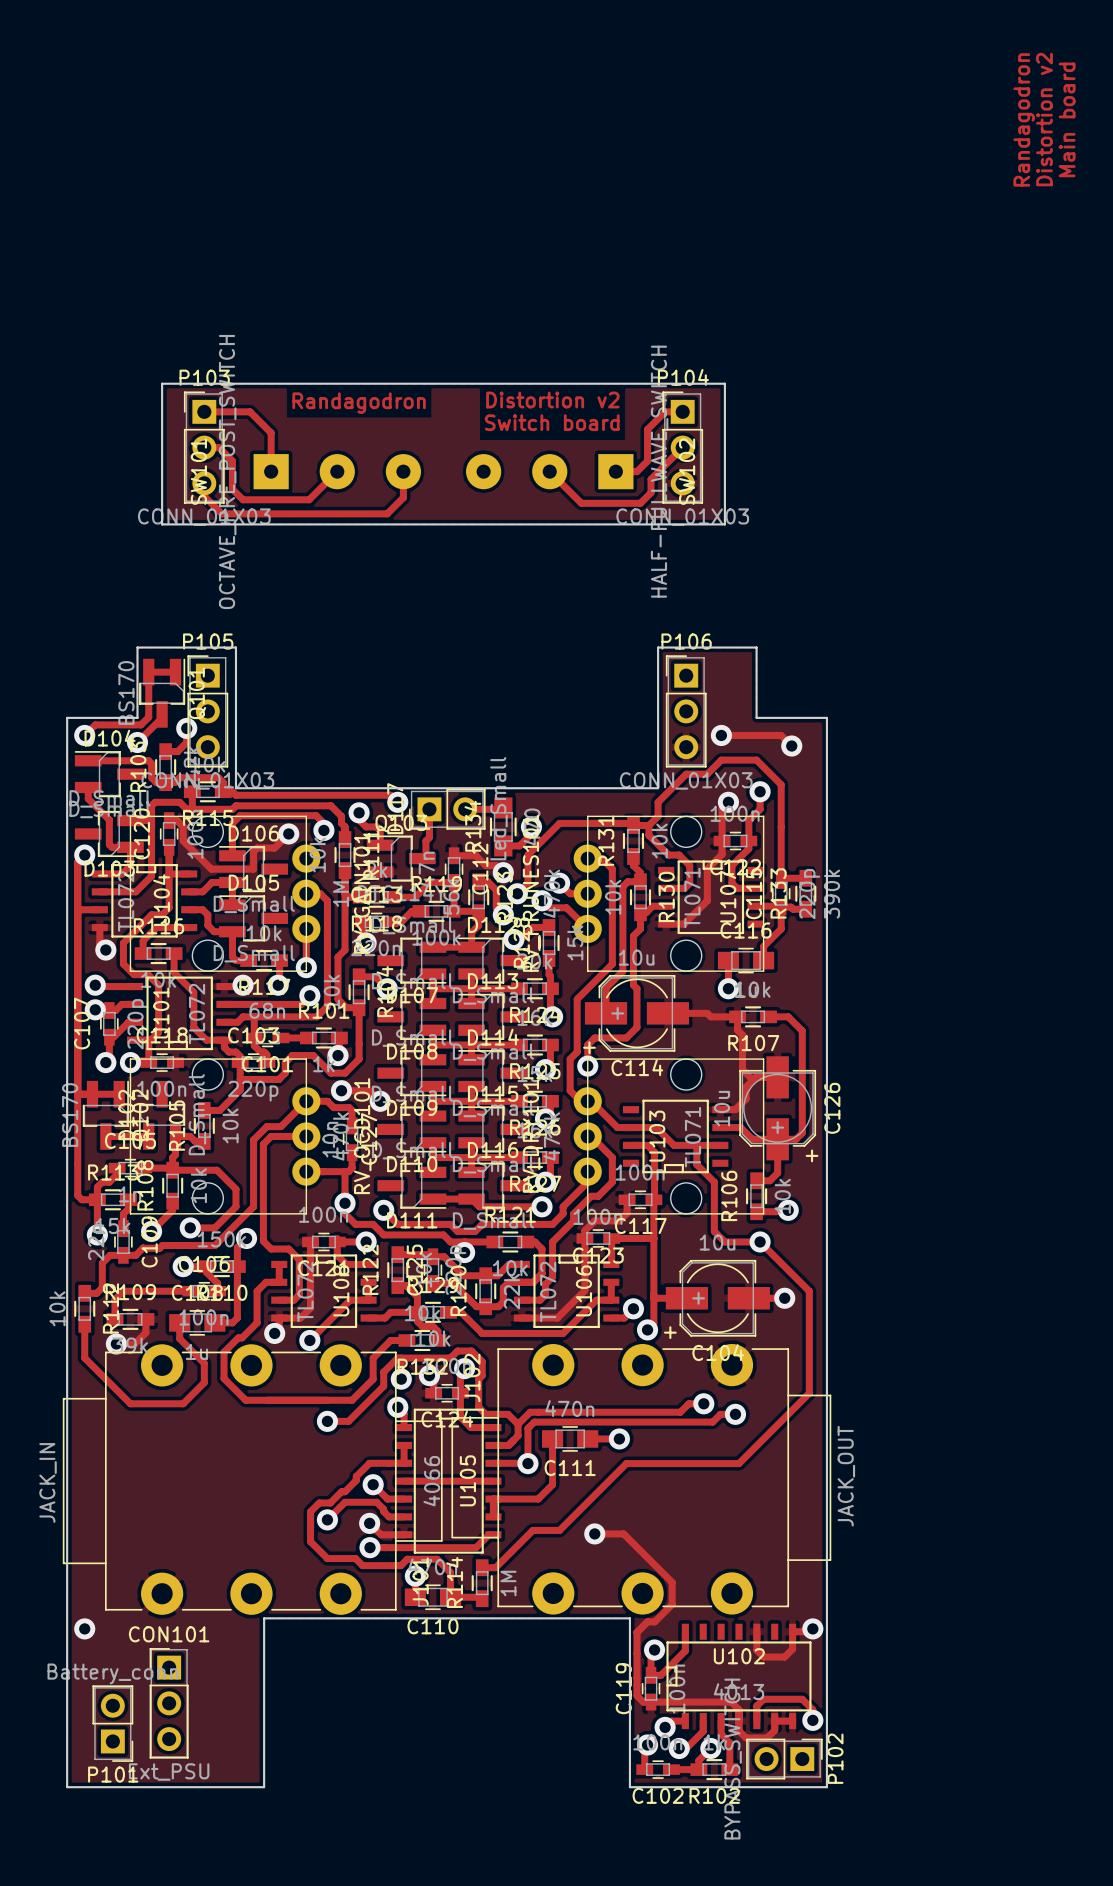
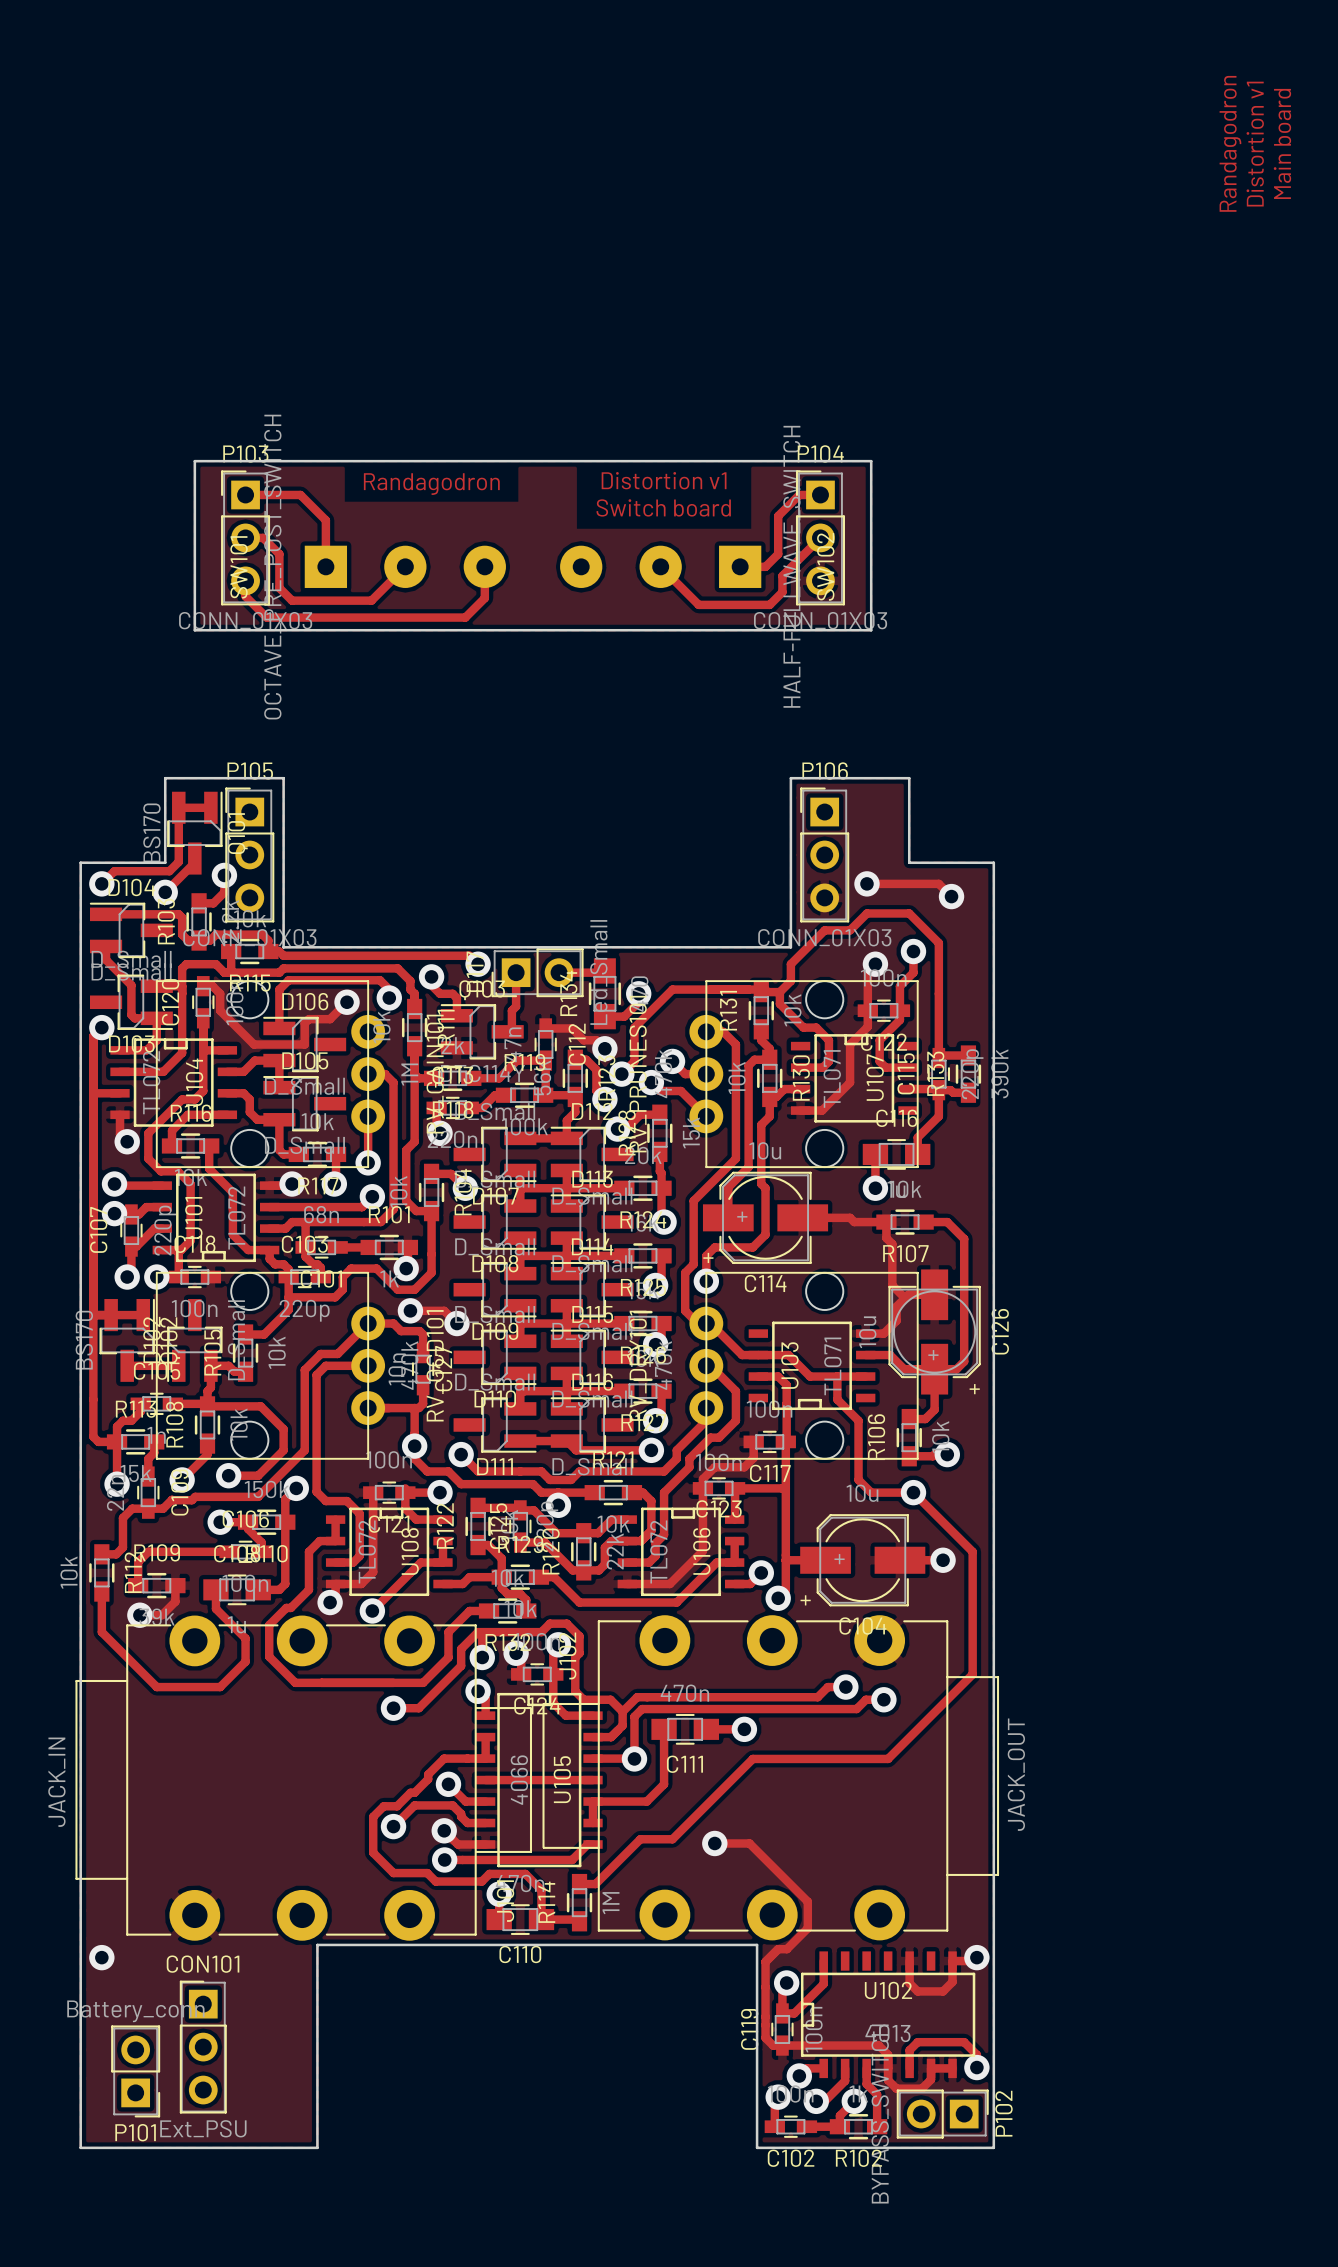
text: Distortion v2 (1044, 119) -> Distortion v1 (1255, 144)
text: Distortion v2 (552, 400) -> Distortion v1 (664, 480)

